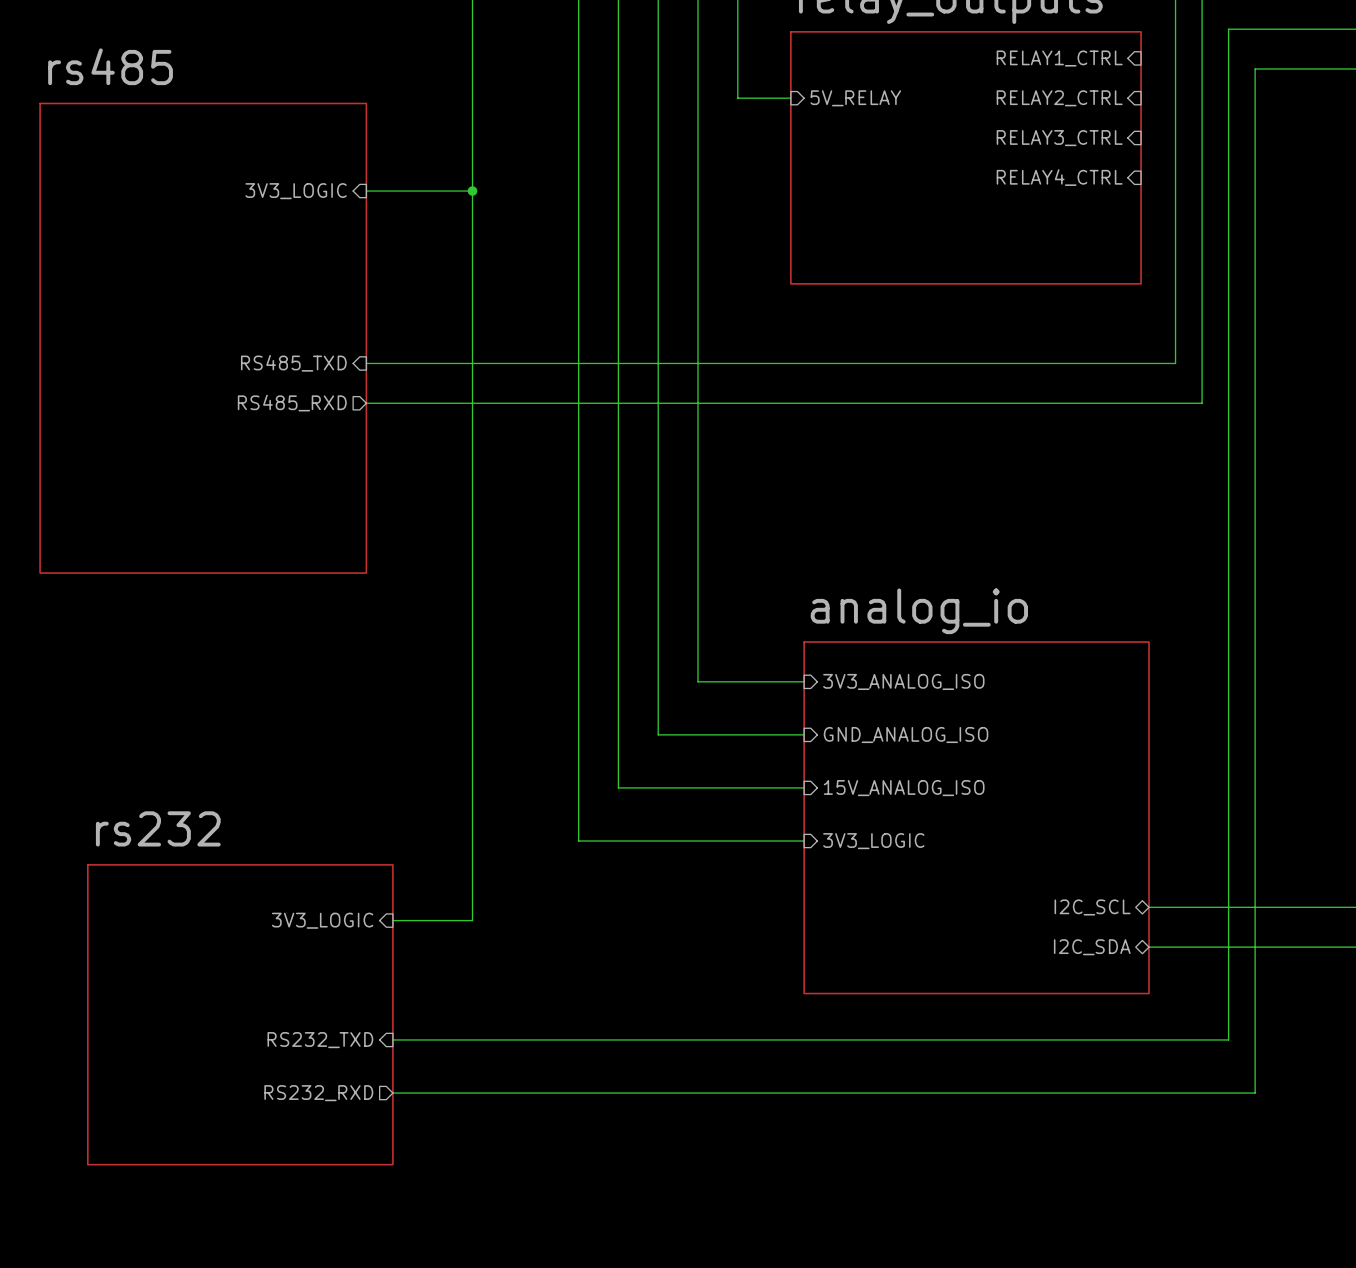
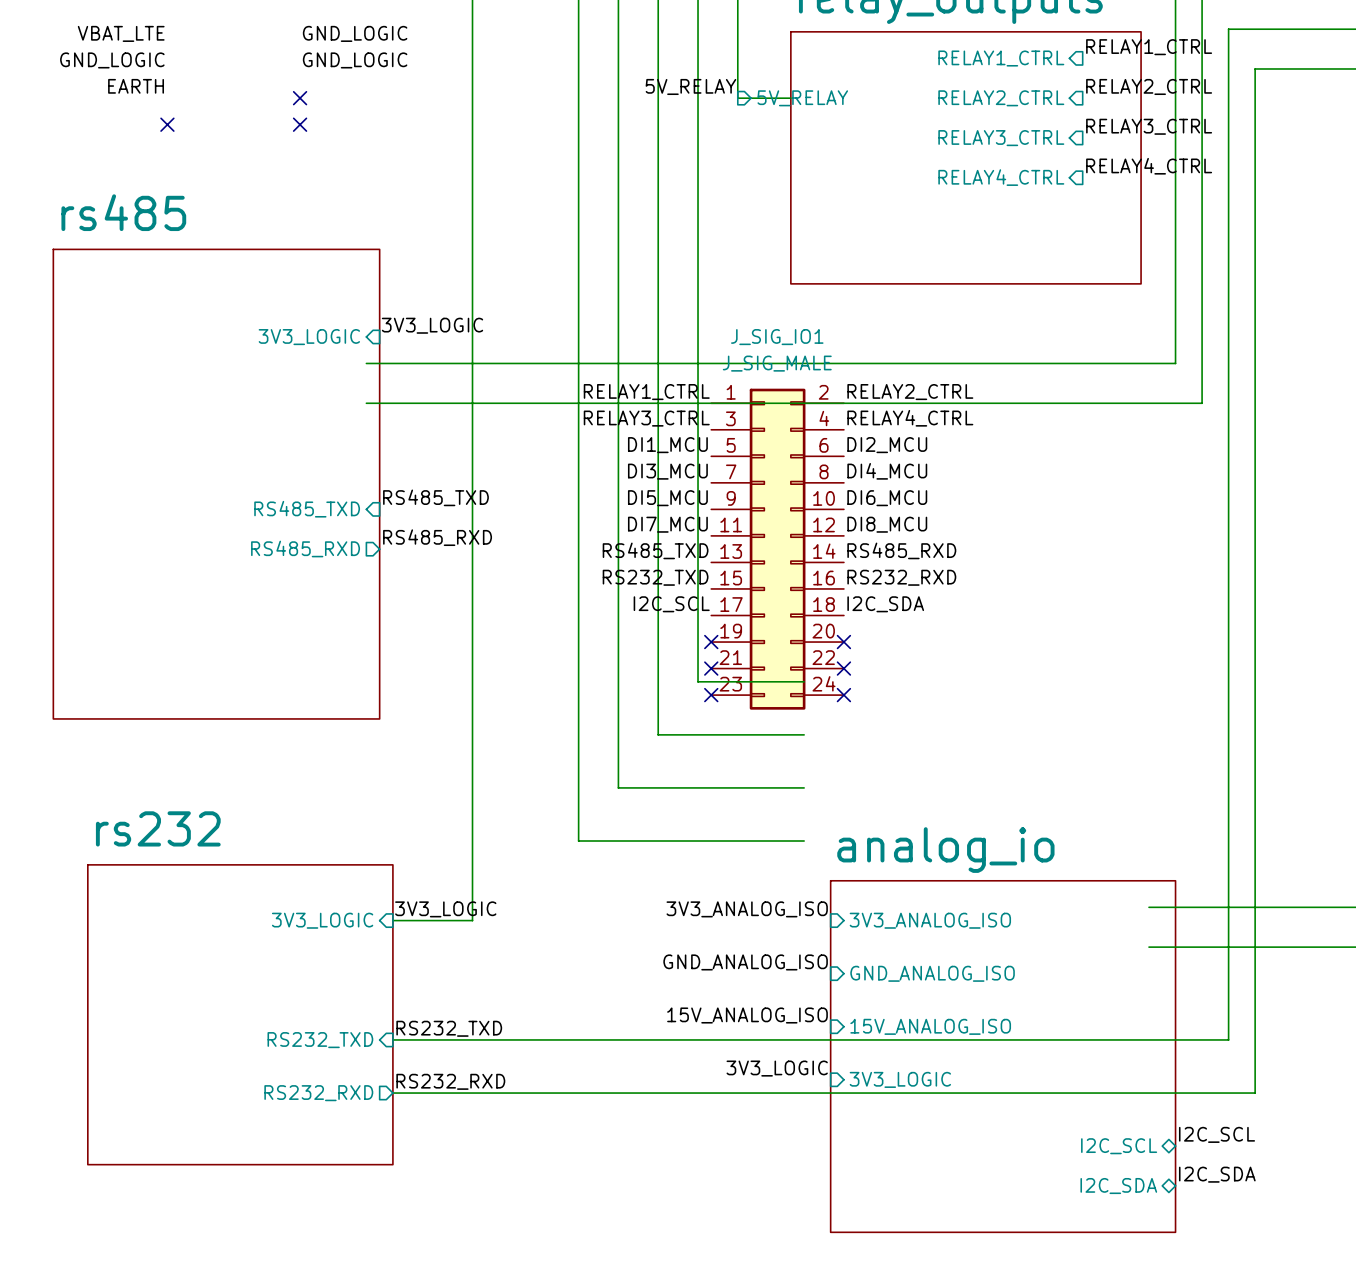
label: none -> VBAT_LTE (121, 33)
label: none -> GND_LOGIC (355, 33)
label: none -> RELAY1_CTRL (1149, 47)
sheet pin position: RELAY1_CTRL (1059, 58) -> RELAY1_CTRL (1001, 58)
label: none -> GND_LOGIC (112, 60)
label: none -> GND_LOGIC (355, 60)
label: none -> EARTH (136, 86)
label: none -> 5V_RELAY (690, 86)
label: none -> RELAY2_CTRL (1149, 86)
no-connect mark: none -> (300, 98)
sheet pin position: 5V_RELAY (855, 98) -> 5V_RELAY (802, 98)
sheet pin position: RELAY2_CTRL (1059, 98) -> RELAY2_CTRL (1001, 98)
no-connect mark: none -> (167, 124)
no-connect mark: none -> (300, 124)
label: none -> RELAY3_CTRL (1149, 126)
sheet pin position: RELAY3_CTRL (1059, 138) -> RELAY3_CTRL (1001, 138)
label: none -> RELAY4_CTRL (1149, 166)
sheet pin position: RELAY4_CTRL (1059, 177) -> RELAY4_CTRL (1001, 177)
sheet pin position: 3V3_LOGIC (296, 191) -> 3V3_LOGIC (309, 337)
wire: (366, 191) (472, 191) -> none
junction: (472, 191) -> none
label: none -> 3V3_LOGIC (432, 325)
sheet rs485 position: (203, 338) -> (216, 484)
sheet pin position: RS485_TXD (293, 363) -> RS485_TXD (307, 509)
label: none -> RELAY1_CTRL (646, 392)
label: none -> RELAY2_CTRL (910, 392)
sheet pin position: RS485_RXD (292, 403) -> RS485_RXD (305, 548)
label: none -> RELAY3_CTRL (646, 418)
label: none -> RELAY4_CTRL (910, 418)
label: none -> DI1_MCU (667, 445)
label: none -> DI2_MCU (887, 445)
label: none -> DI3_MCU (667, 471)
label: none -> DI4_MCU (887, 471)
label: none -> RS485_TXD (435, 497)
label: none -> DI5_MCU (667, 498)
label: none -> DI6_MCU (887, 498)
label: none -> DI7_MCU (667, 524)
label: none -> DI8_MCU (887, 524)
label: none -> RS485_RXD (437, 537)
J_SIG_IO1: none -> J_SIG_MALE (777, 549)
label: none -> RS485_TXD (655, 550)
label: none -> RS485_RXD (901, 550)
label: none -> RS232_TXD (655, 577)
label: none -> RS232_RXD (901, 577)
label: none -> I2C_SCL (671, 604)
label: none -> I2C_SDA (885, 604)
no-connect mark: none -> (711, 642)
no-connect mark: none -> (843, 642)
no-connect mark: none -> (711, 668)
no-connect mark: none -> (843, 668)
sheet pin position: 3V3_ANALOG_ISO (903, 681) -> 3V3_ANALOG_ISO (930, 920)
no-connect mark: none -> (711, 695)
no-connect mark: none -> (843, 695)
sheet pin position: GND_ANALOG_ISO (906, 735) -> GND_ANALOG_ISO (932, 973)
sheet pin position: 15V_ANALOG_ISO (904, 788) -> 15V_ANALOG_ISO (930, 1026)
sheet analog_io position: (976, 817) -> (1003, 1056)
sheet pin position: 3V3_LOGIC (873, 841) -> 3V3_LOGIC (900, 1079)
sheet pin position: I2C_SCL (1092, 907) -> I2C_SCL (1119, 1146)
label: none -> 3V3_LOGIC (445, 909)
label: none -> 3V3_ANALOG_ISO (747, 909)
sheet pin position: I2C_SDA (1092, 947) -> I2C_SDA (1118, 1186)
label: none -> GND_ANALOG_ISO (745, 962)
label: none -> 15V_ANALOG_ISO (747, 1015)
label: none -> RS232_TXD (449, 1028)
label: none -> 3V3_LOGIC (777, 1068)
label: none -> RS232_RXD (450, 1081)
label: none -> I2C_SCL (1217, 1134)
label: none -> I2C_SDA (1217, 1174)

